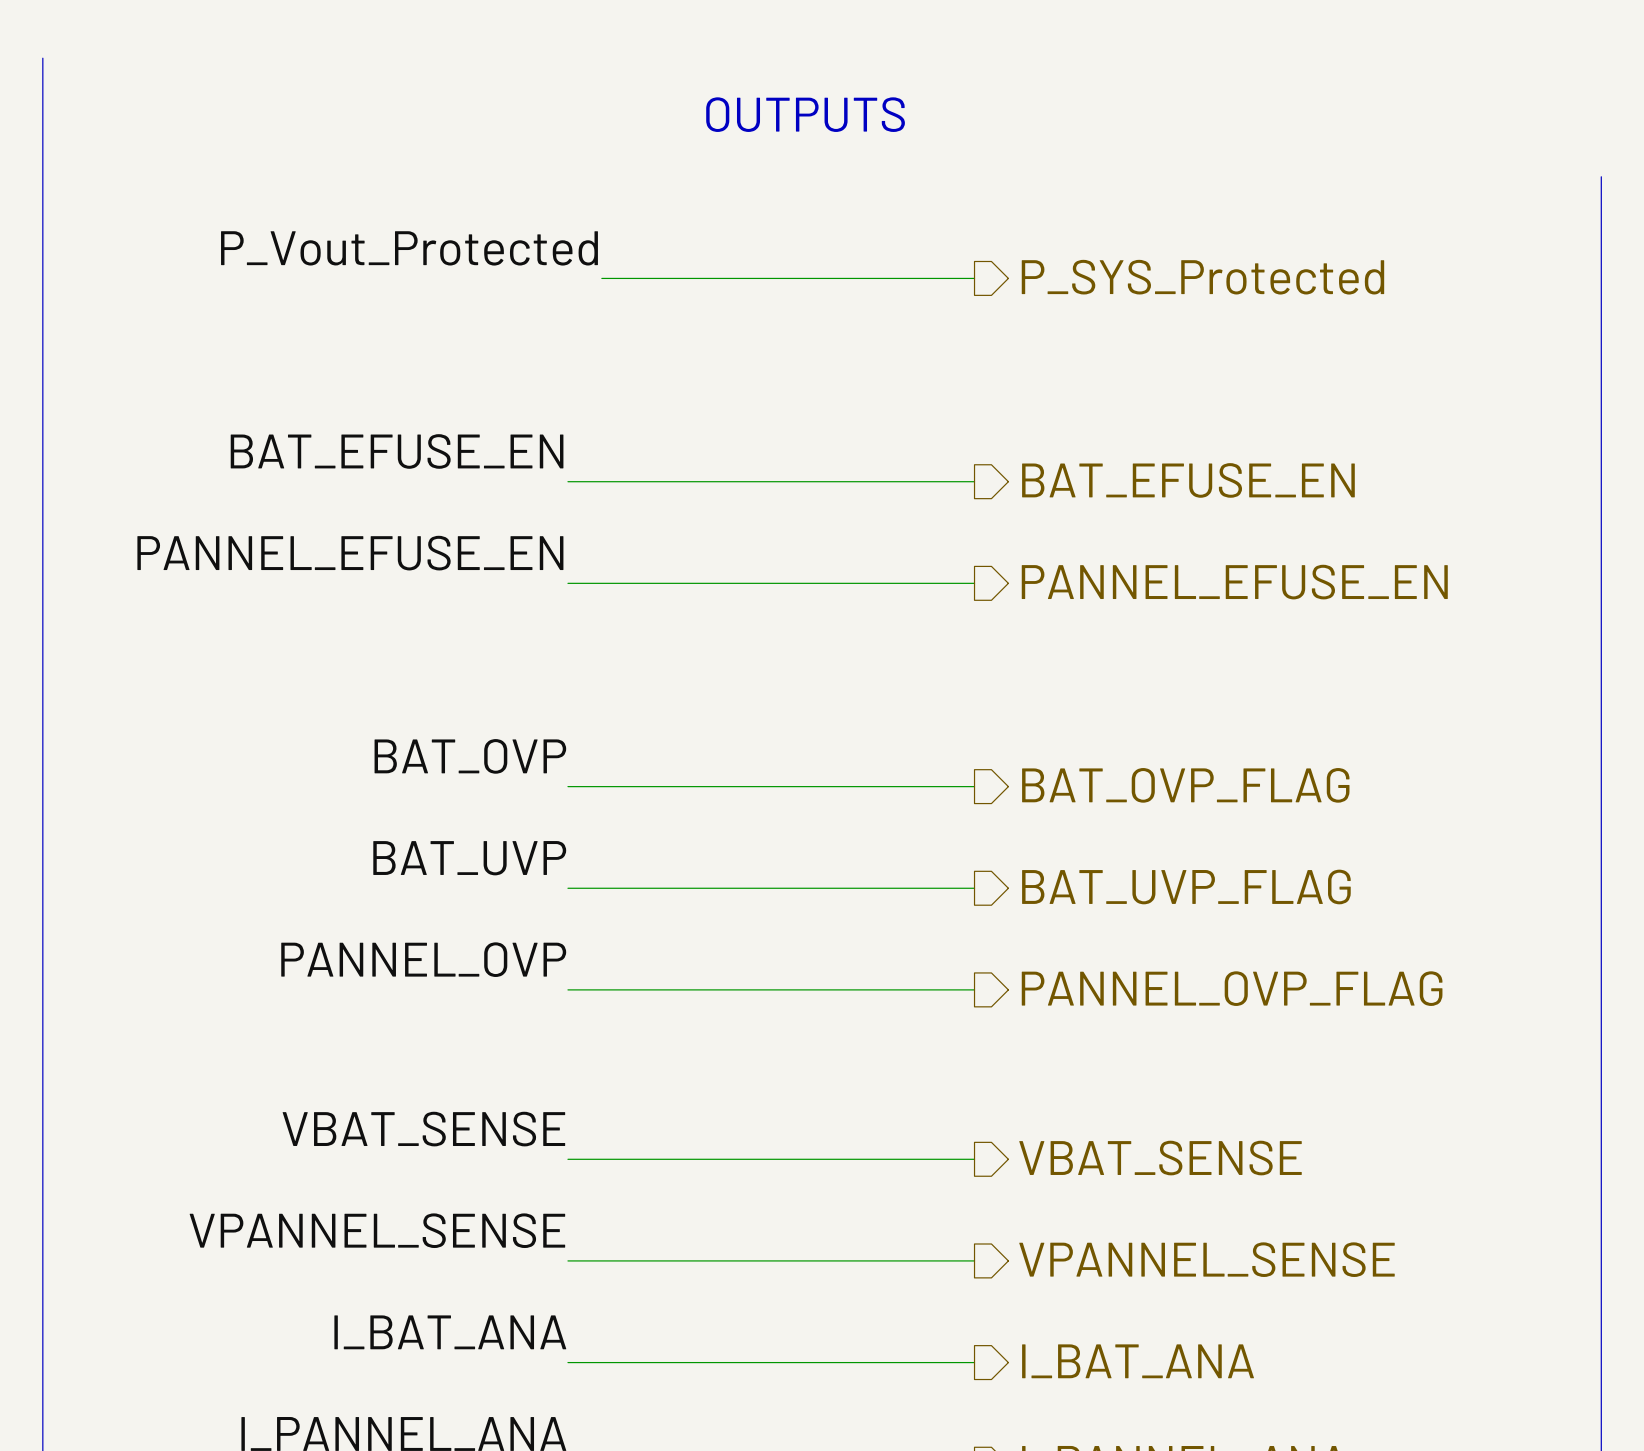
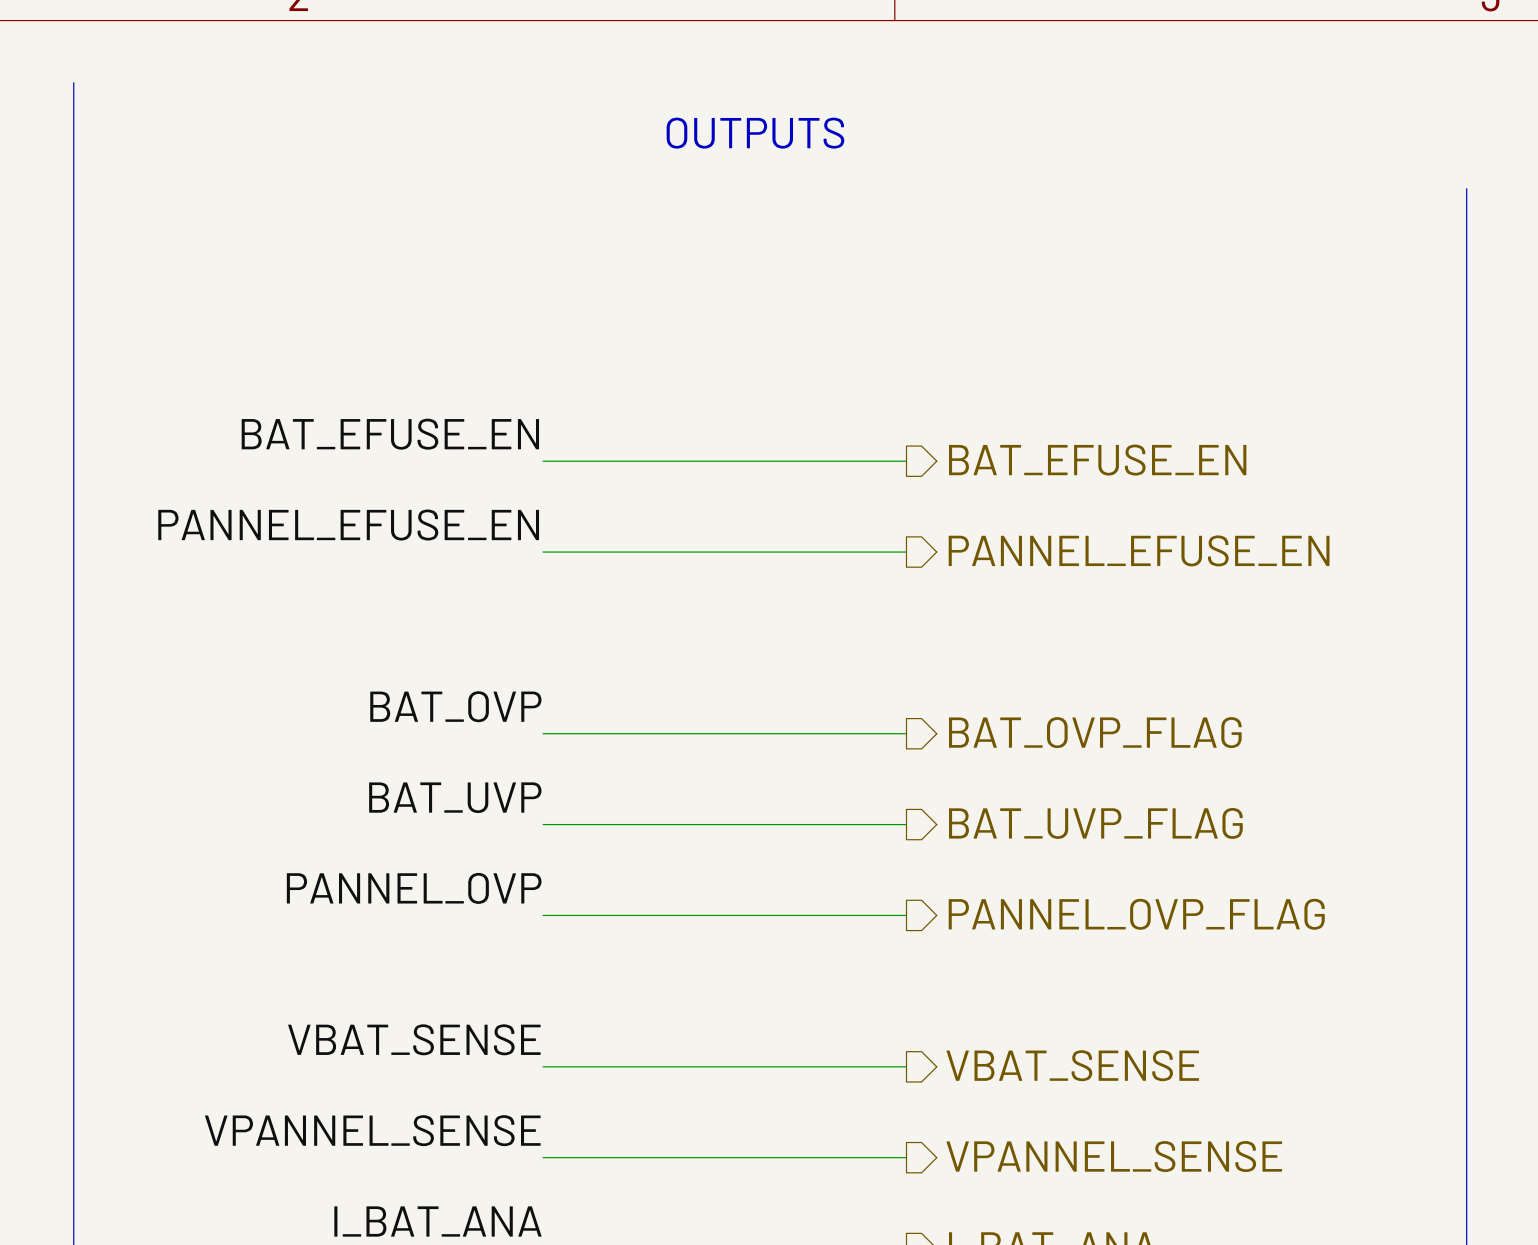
label: P_Vout_Protected (409, 248) -> none
hierarchical label: P_SYS_Protected (1202, 277) -> none
wire: (601, 278) (974, 278) -> none

